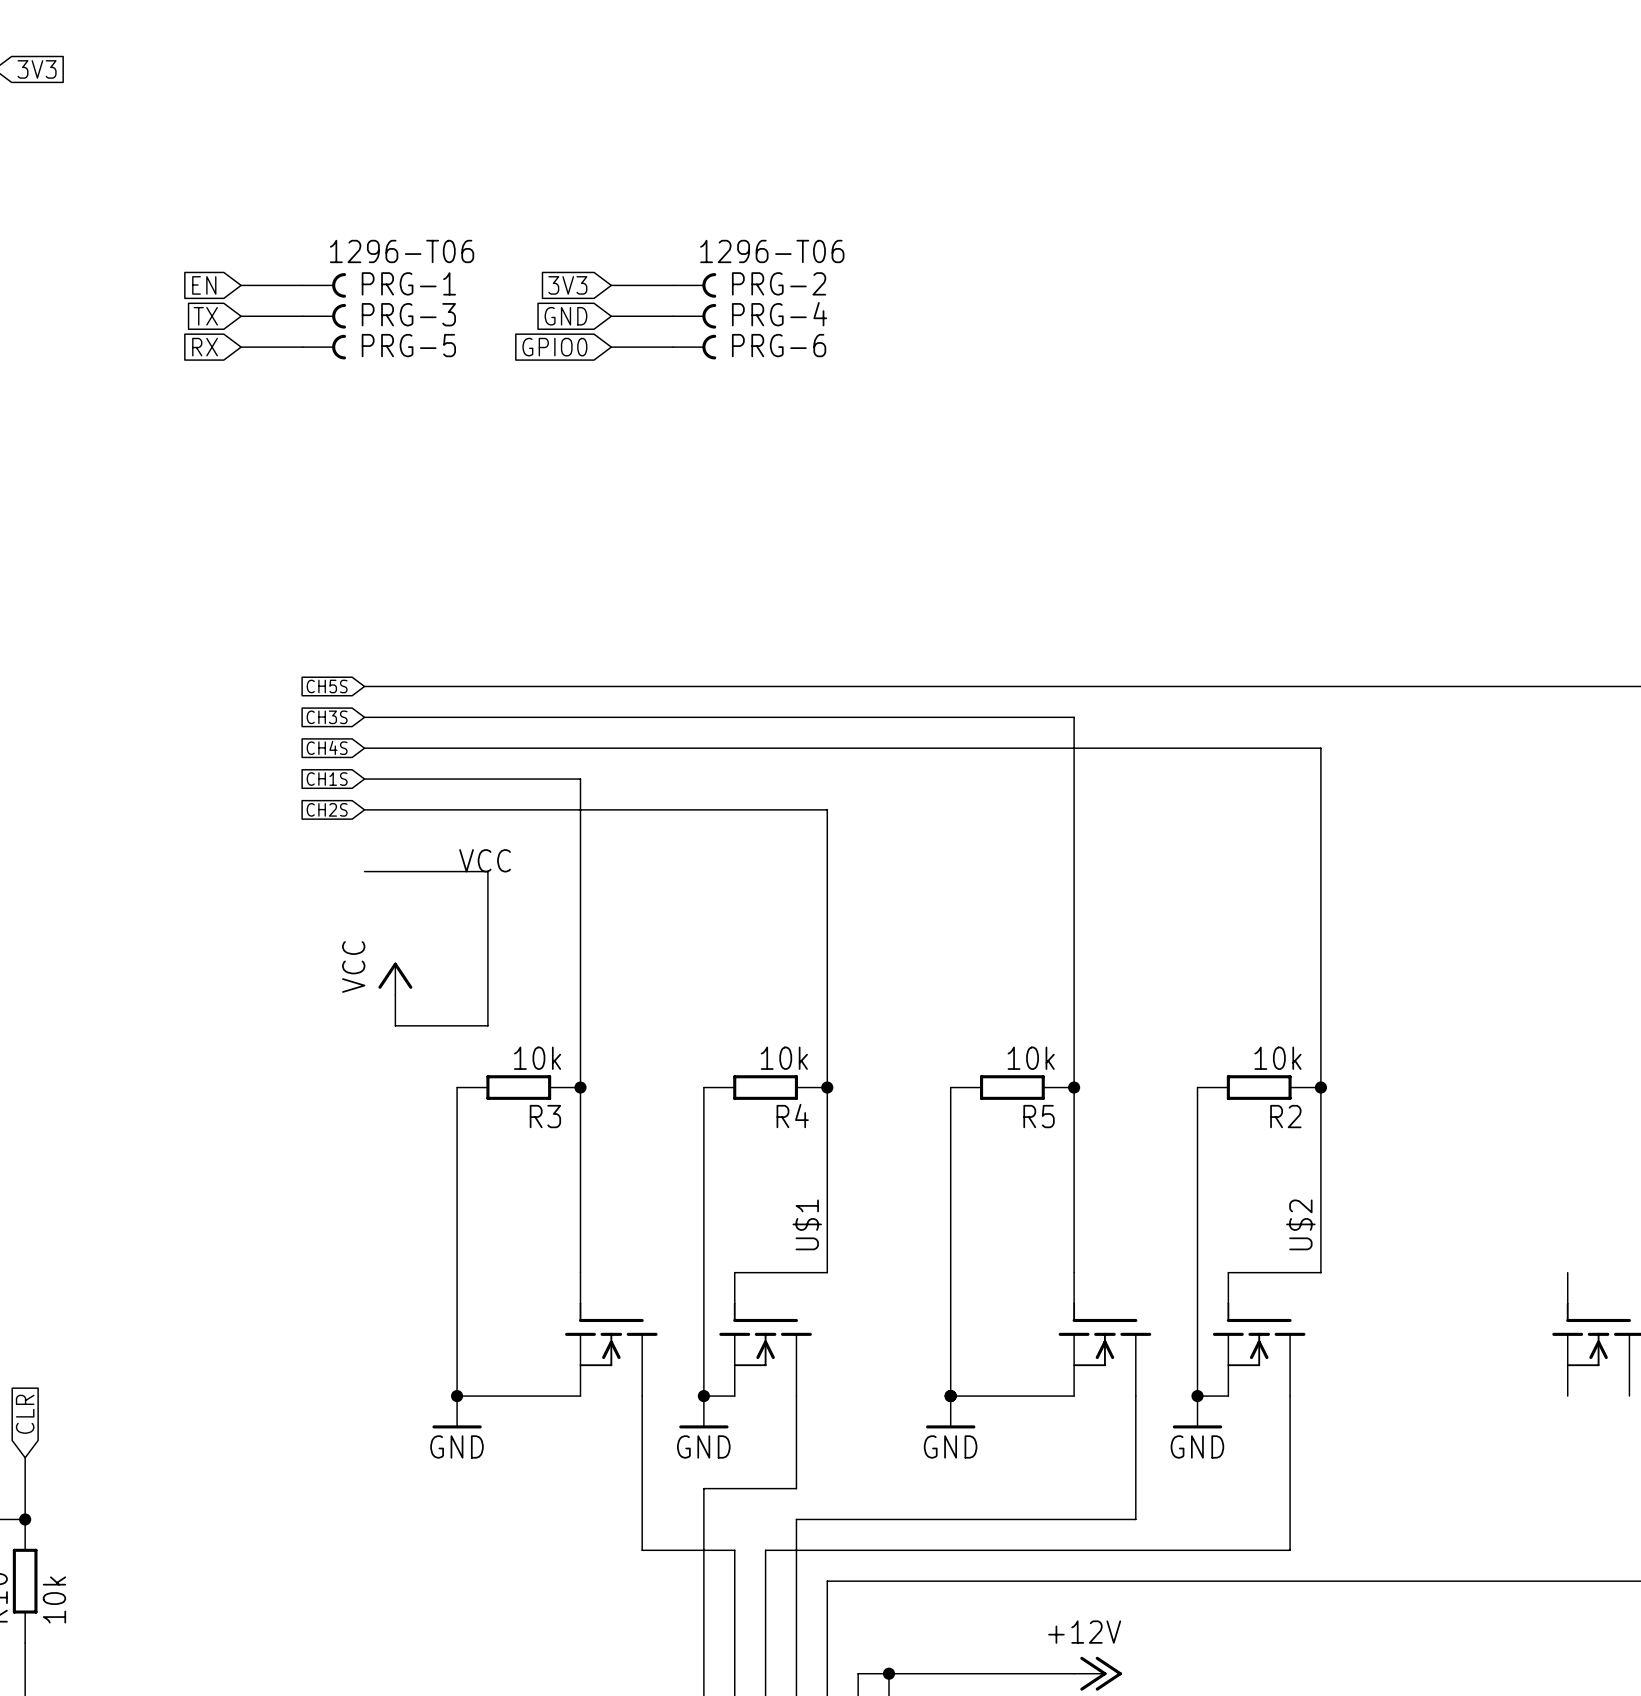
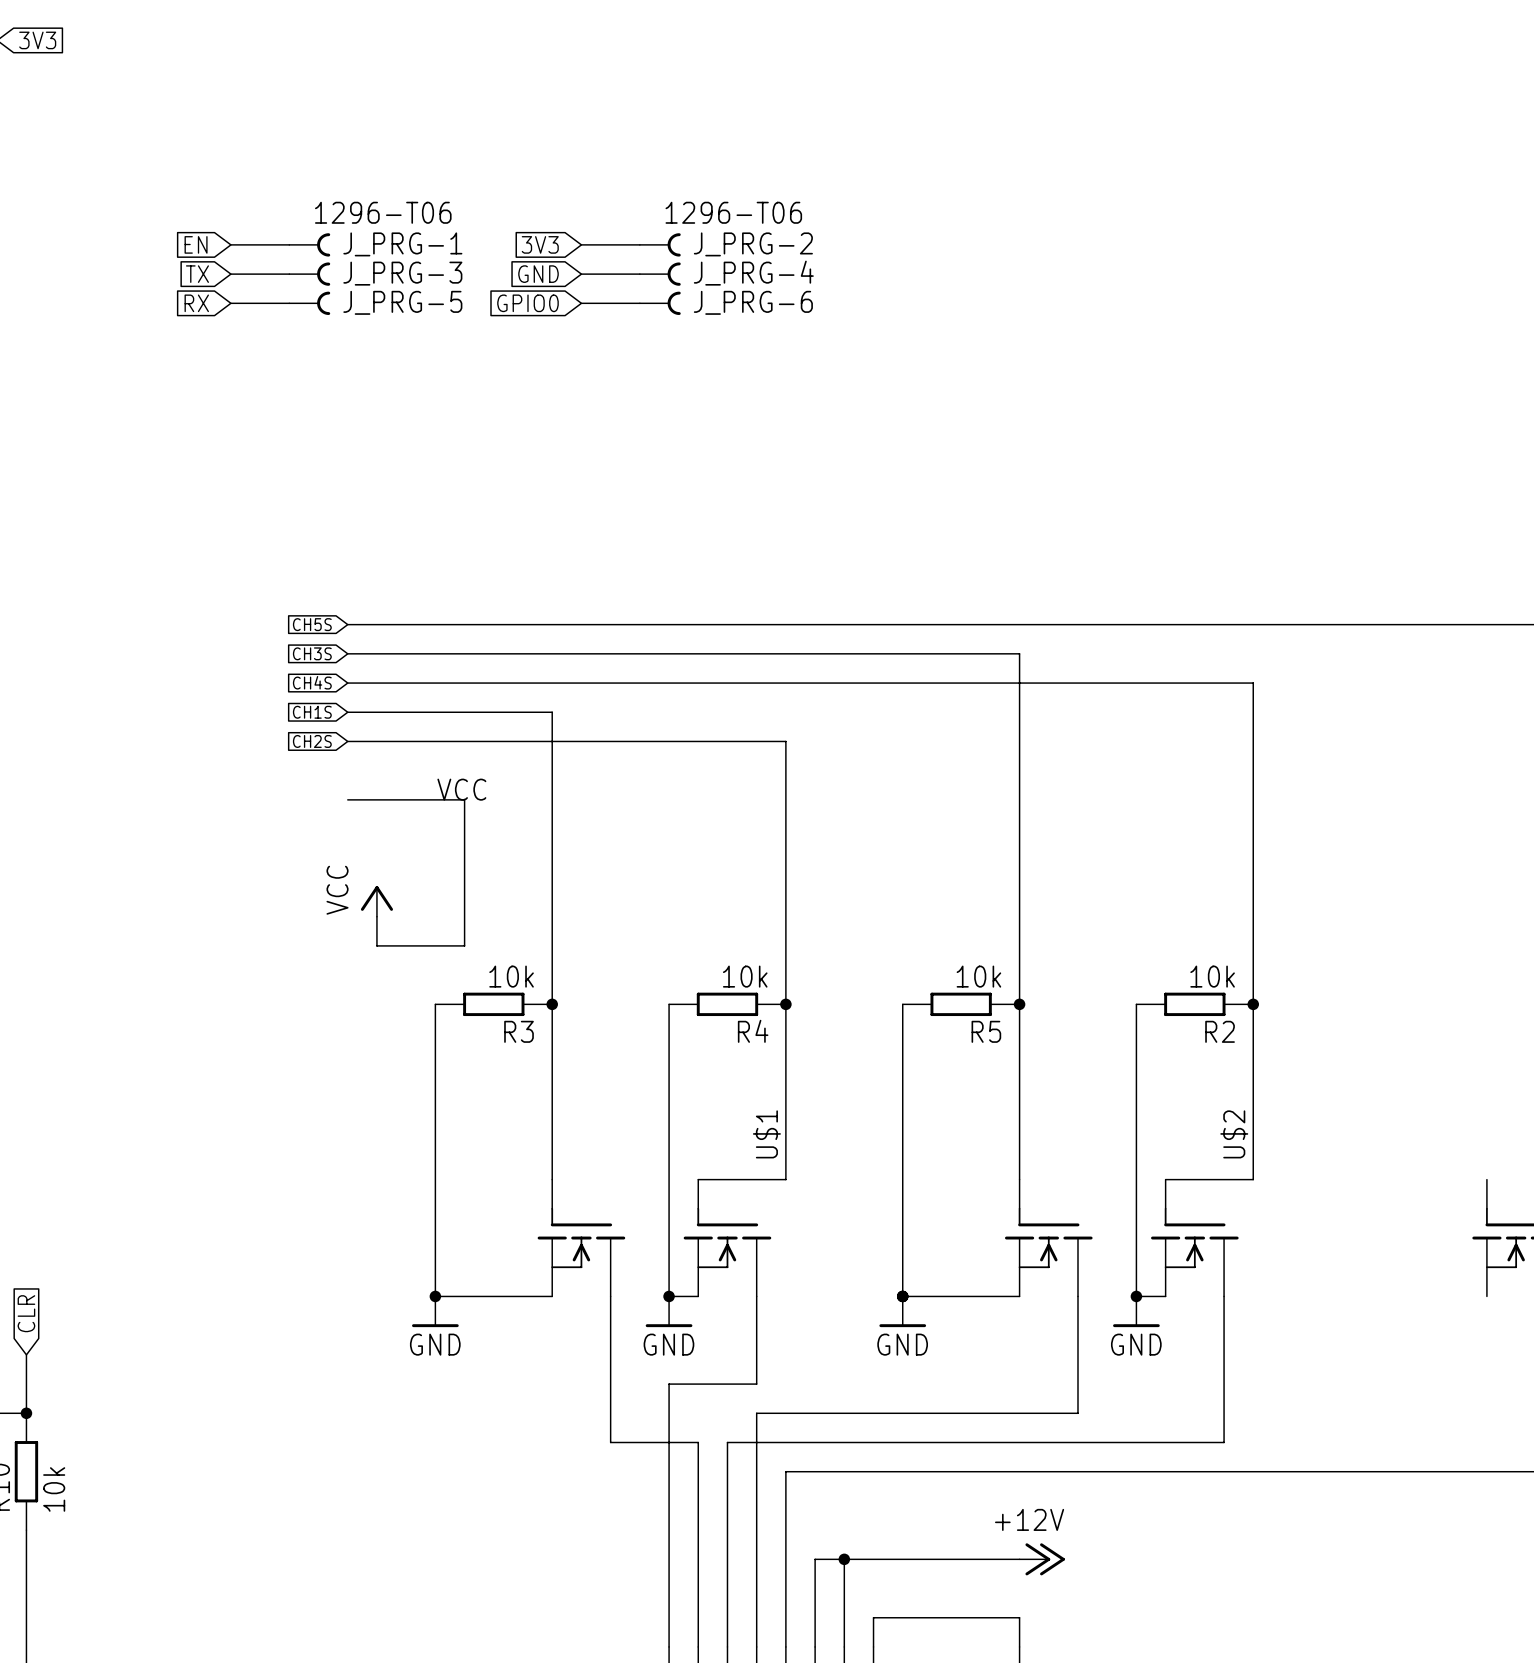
PRG-1 name: PRG-1 (408, 283) -> J_PRG-1 (402, 244)
PRG-2 name: PRG-2 (779, 283) -> J_PRG-2 (753, 244)
PRG-3 name: PRG-3 (408, 314) -> J_PRG-3 (402, 273)
PRG-4 name: PRG-4 (779, 314) -> J_PRG-4 (753, 273)
PRG-5 name: PRG-5 (408, 345) -> J_PRG-5 (402, 302)
PRG-6 name: PRG-6 (779, 345) -> J_PRG-6 (753, 302)

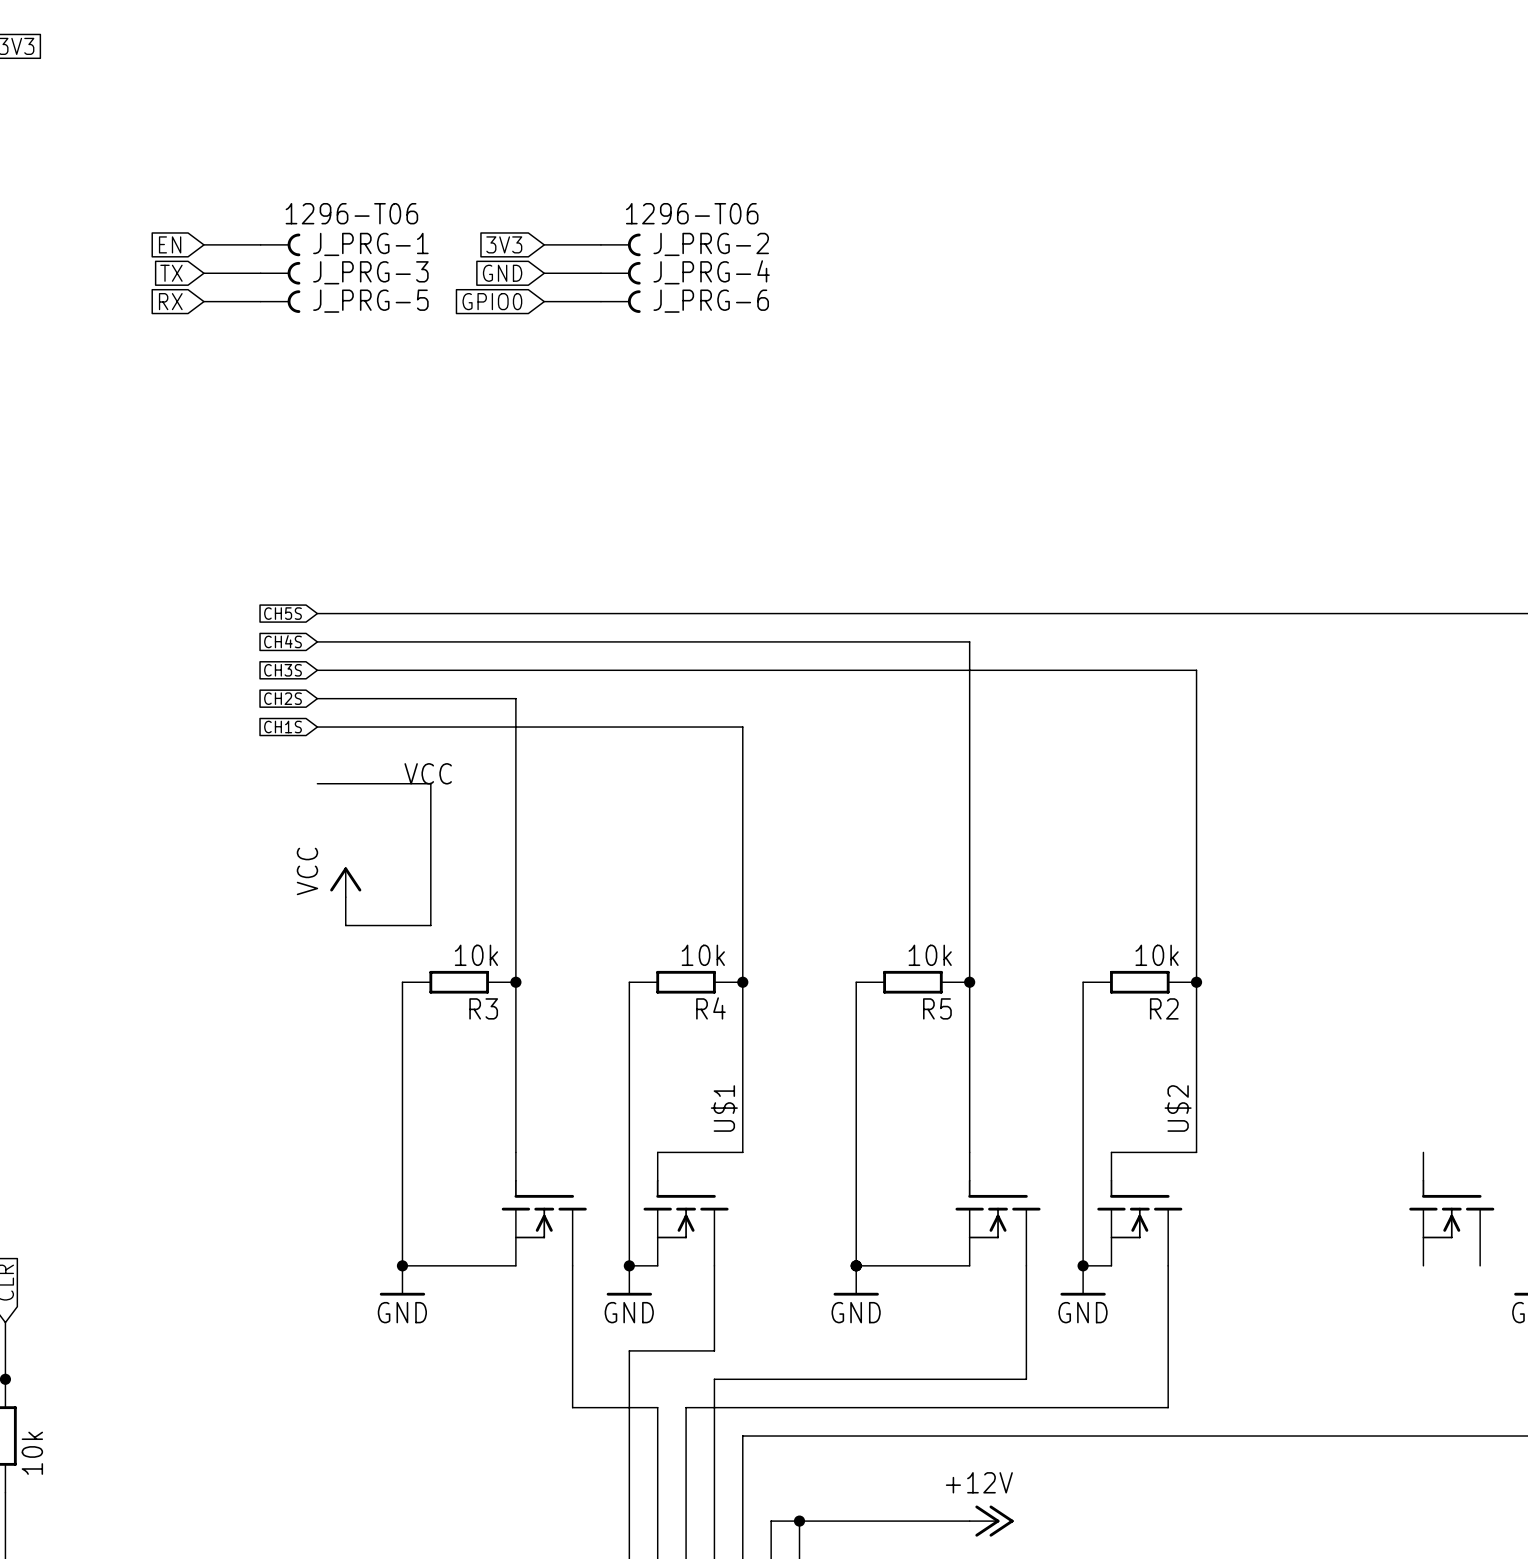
global label: CH3S (312, 653) -> CH4S (283, 641)
global label: CH4S (312, 682) -> CH3S (283, 670)
global label: CH1S (312, 712) -> CH2S (283, 698)
global label: CH2S (312, 741) -> CH1S (283, 727)

